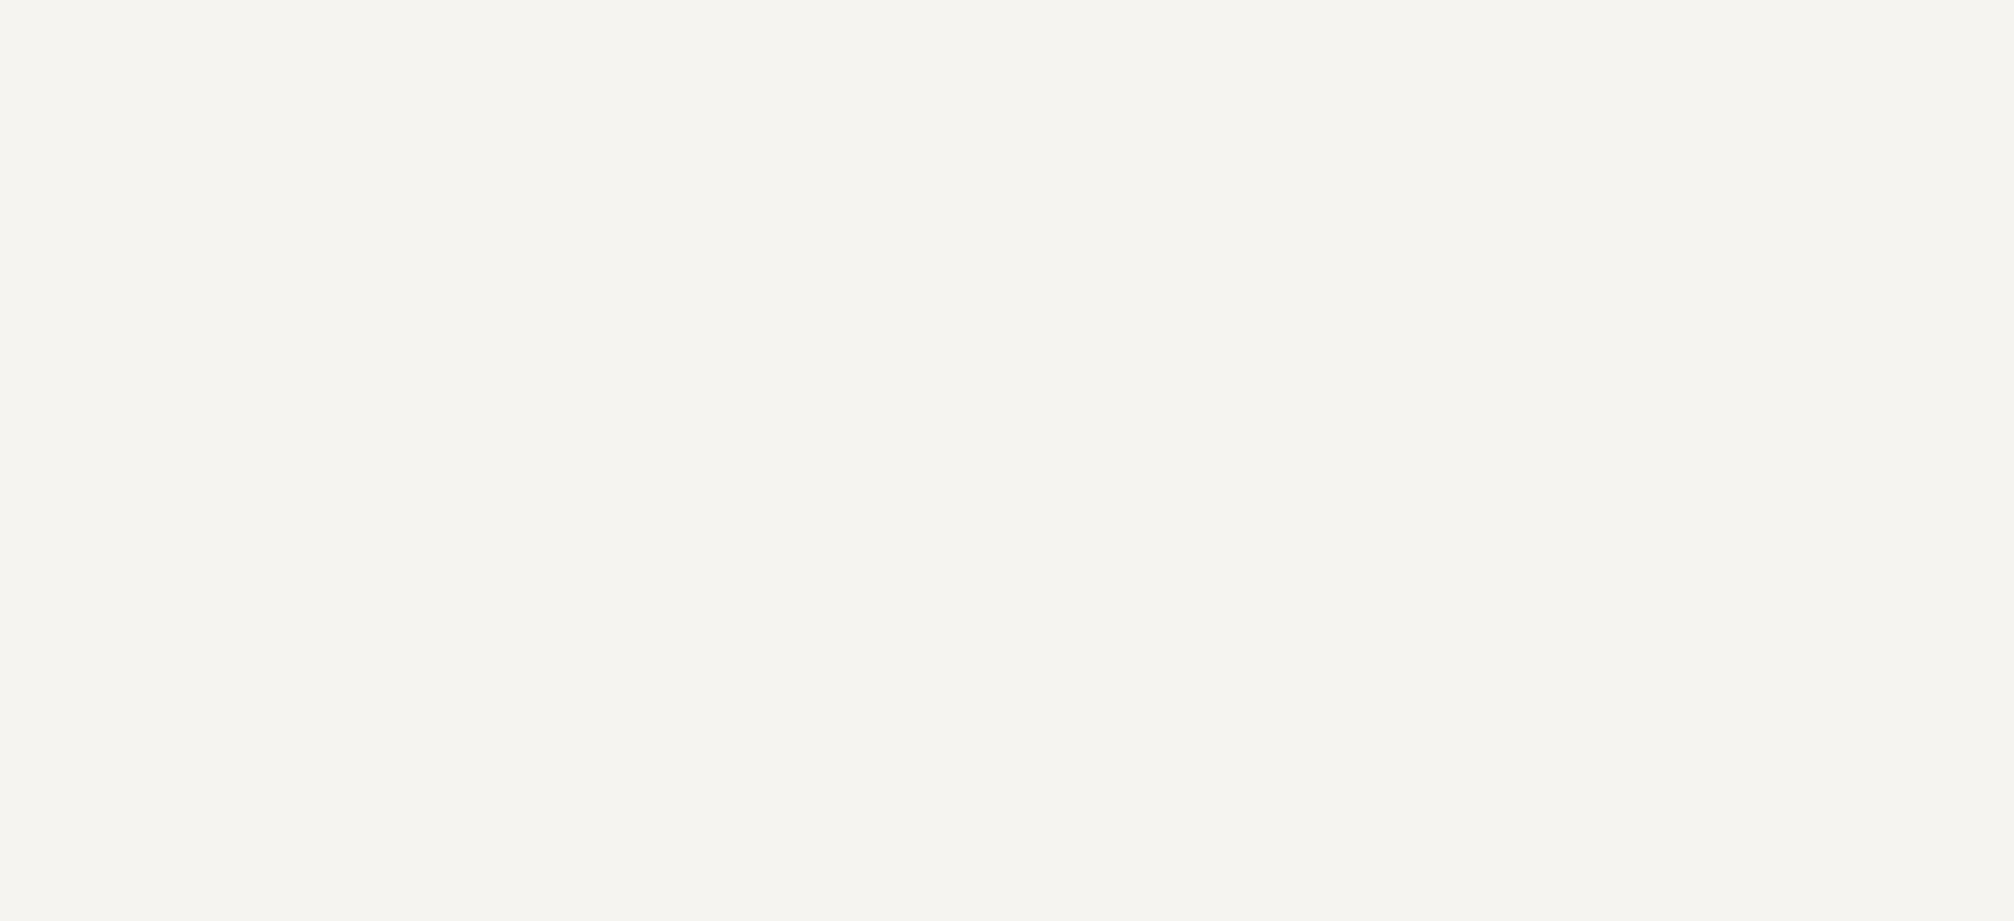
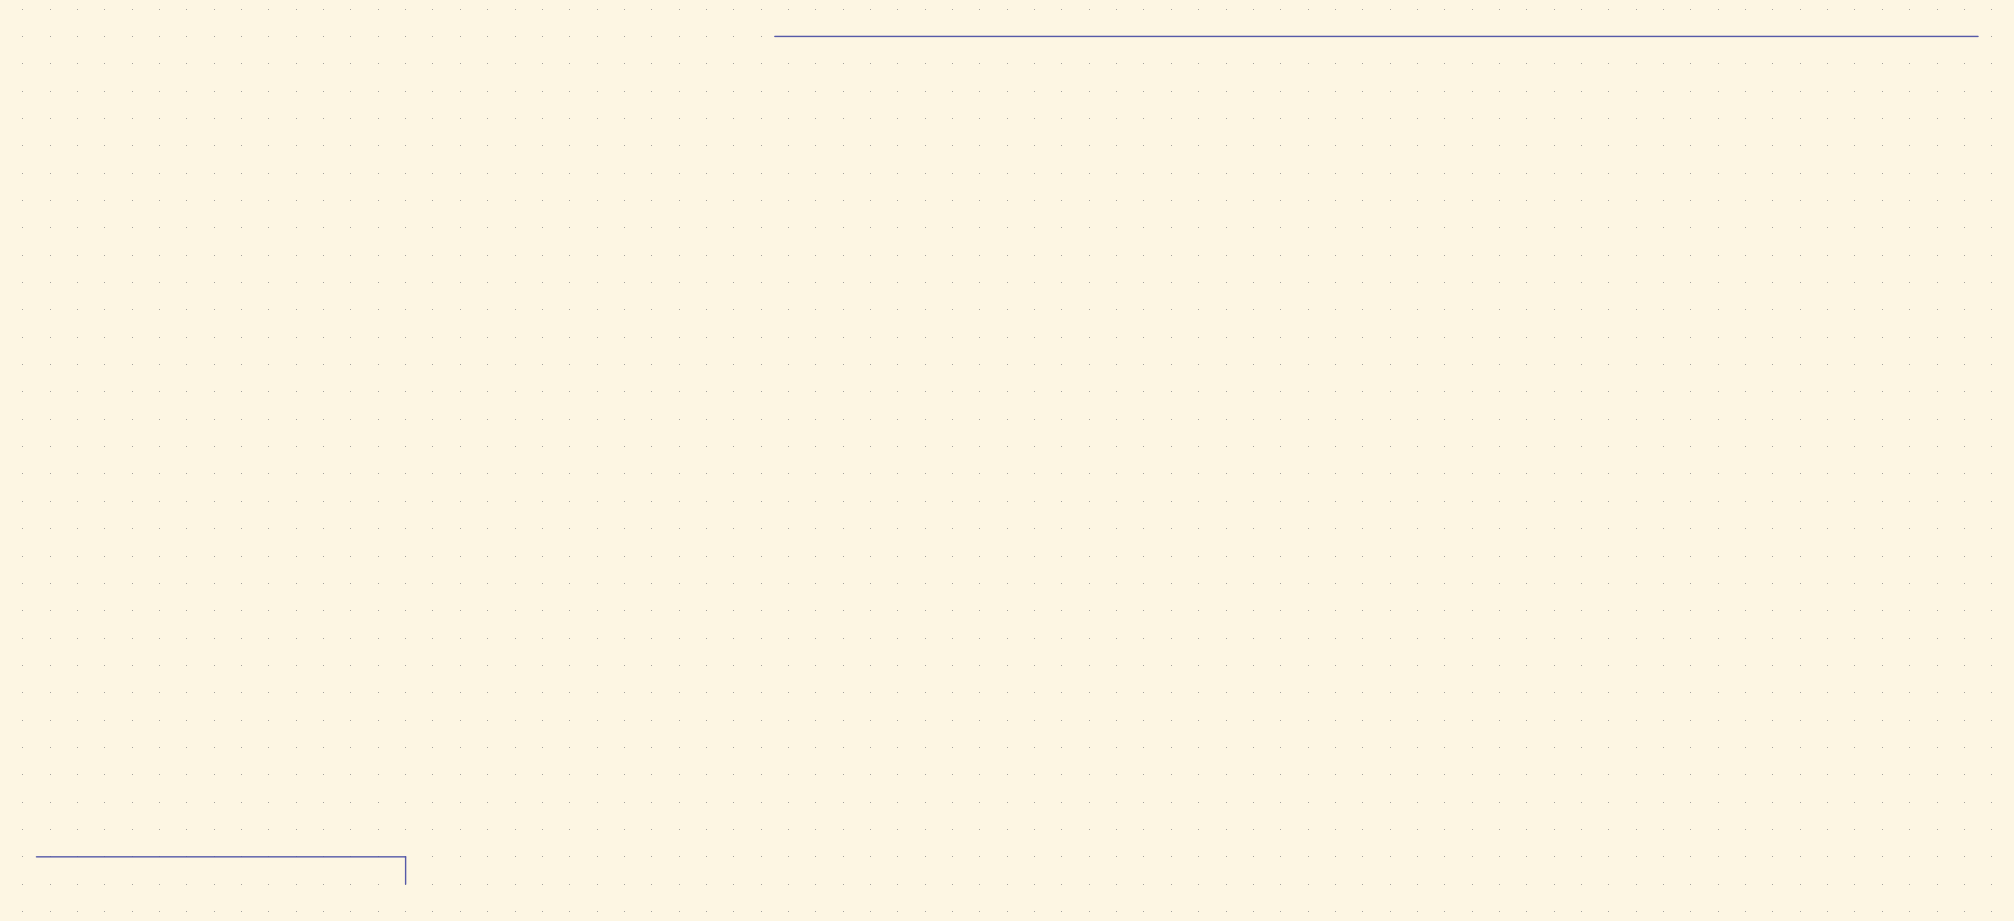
bus: none -> (774, 36) (1978, 36)
bus: none -> (36, 856) (405, 856) (405, 884)

